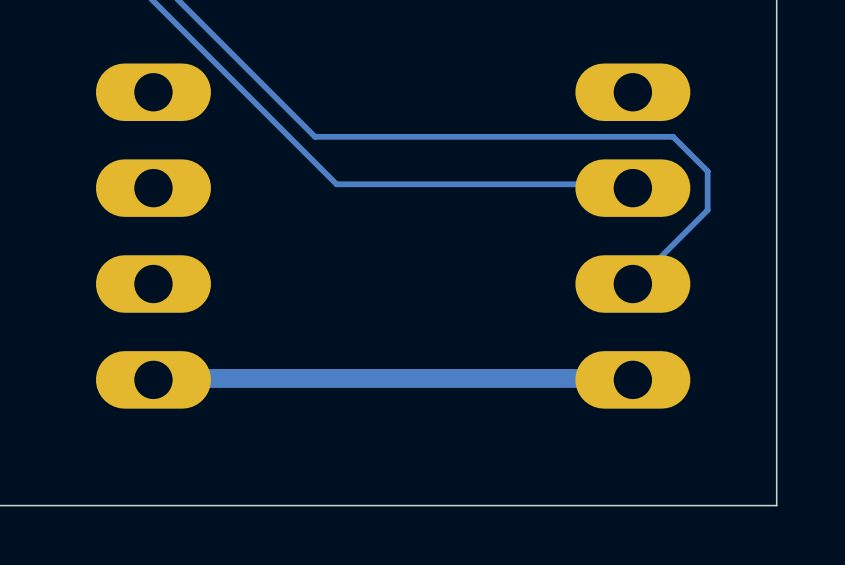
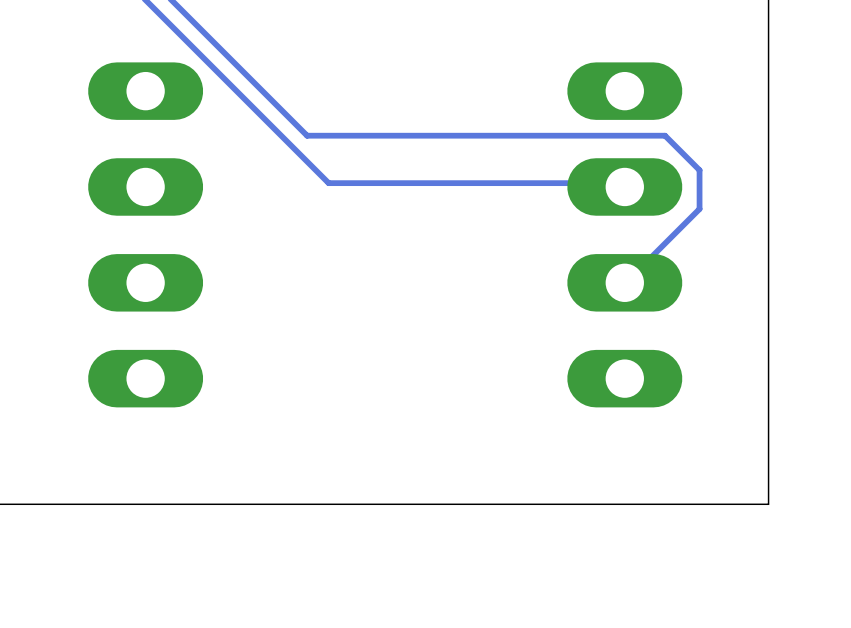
track: (632, 379) (153, 379) -> none

